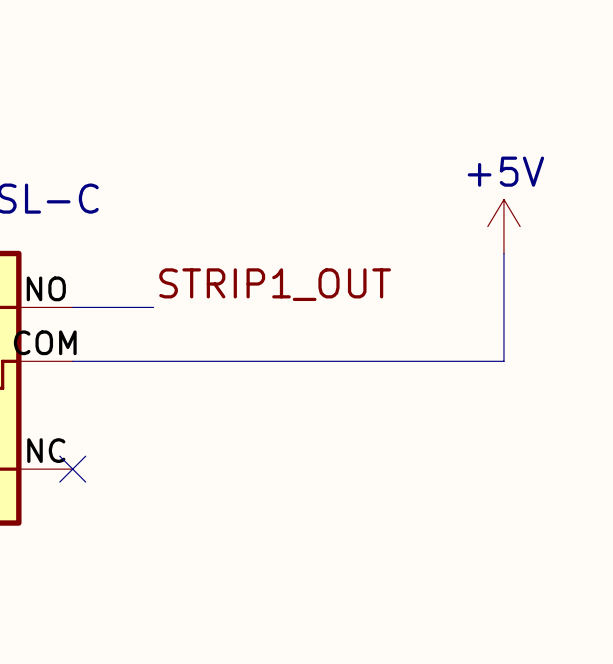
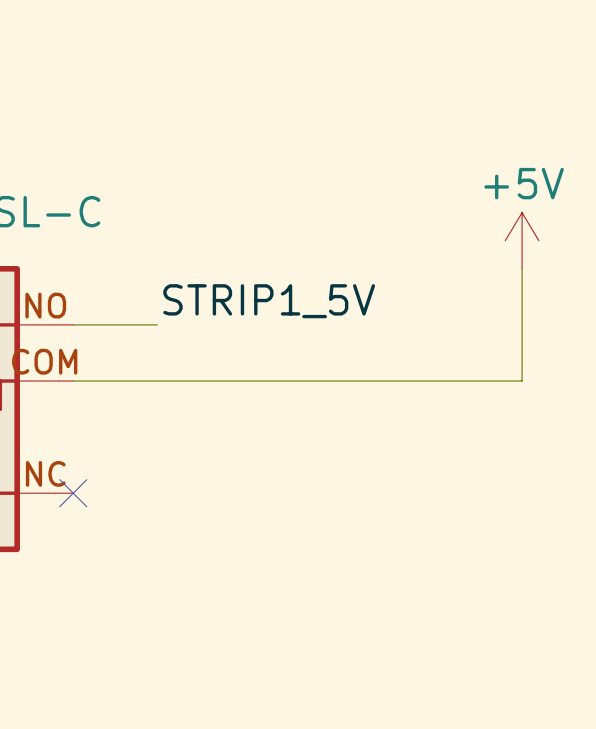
label: STRIP1_OUT (275, 284) -> STRIP1_5V (269, 301)

